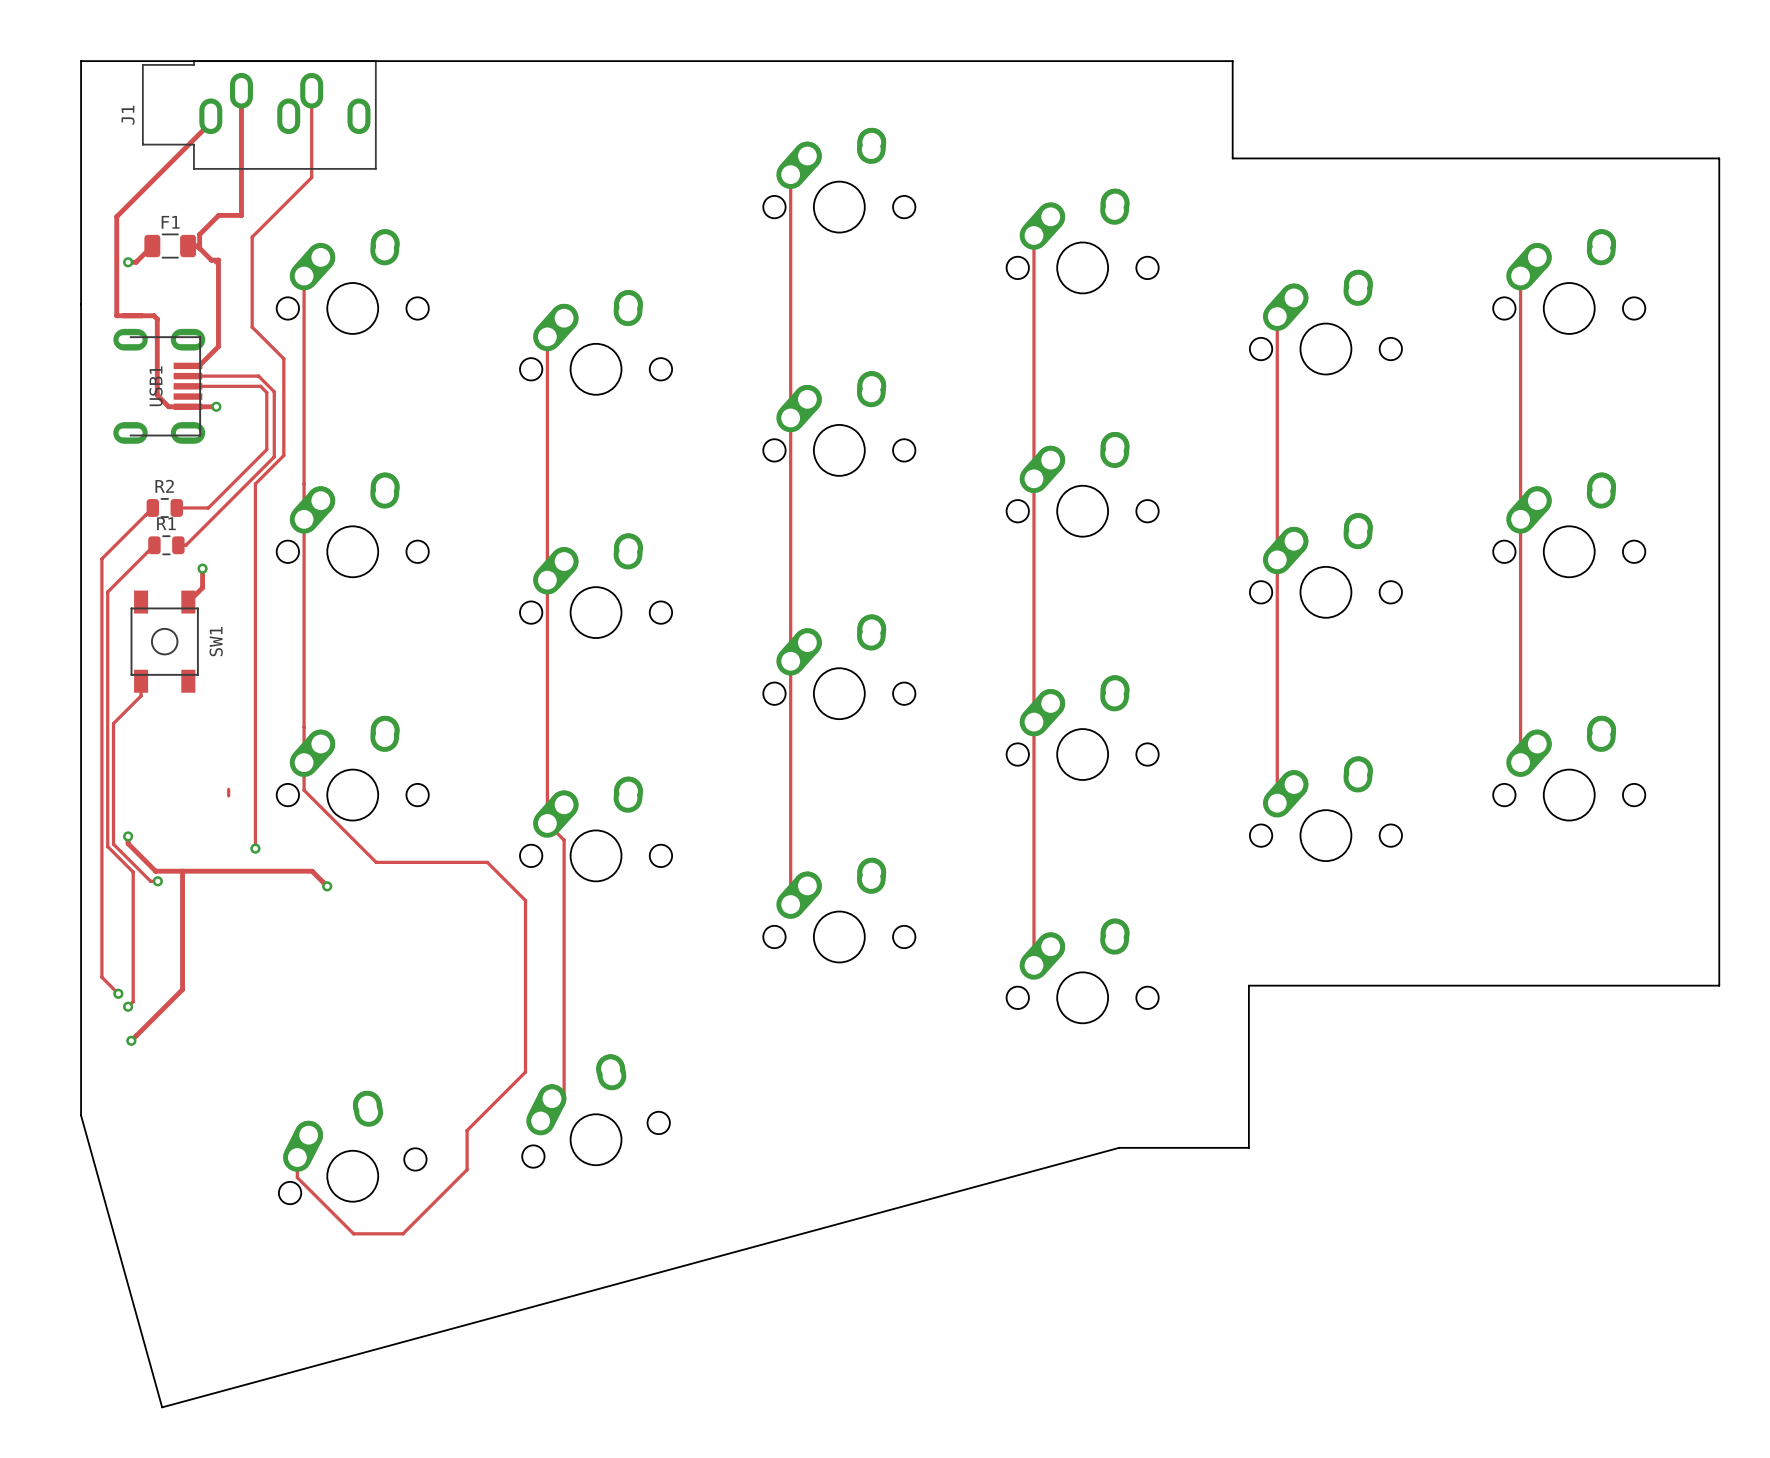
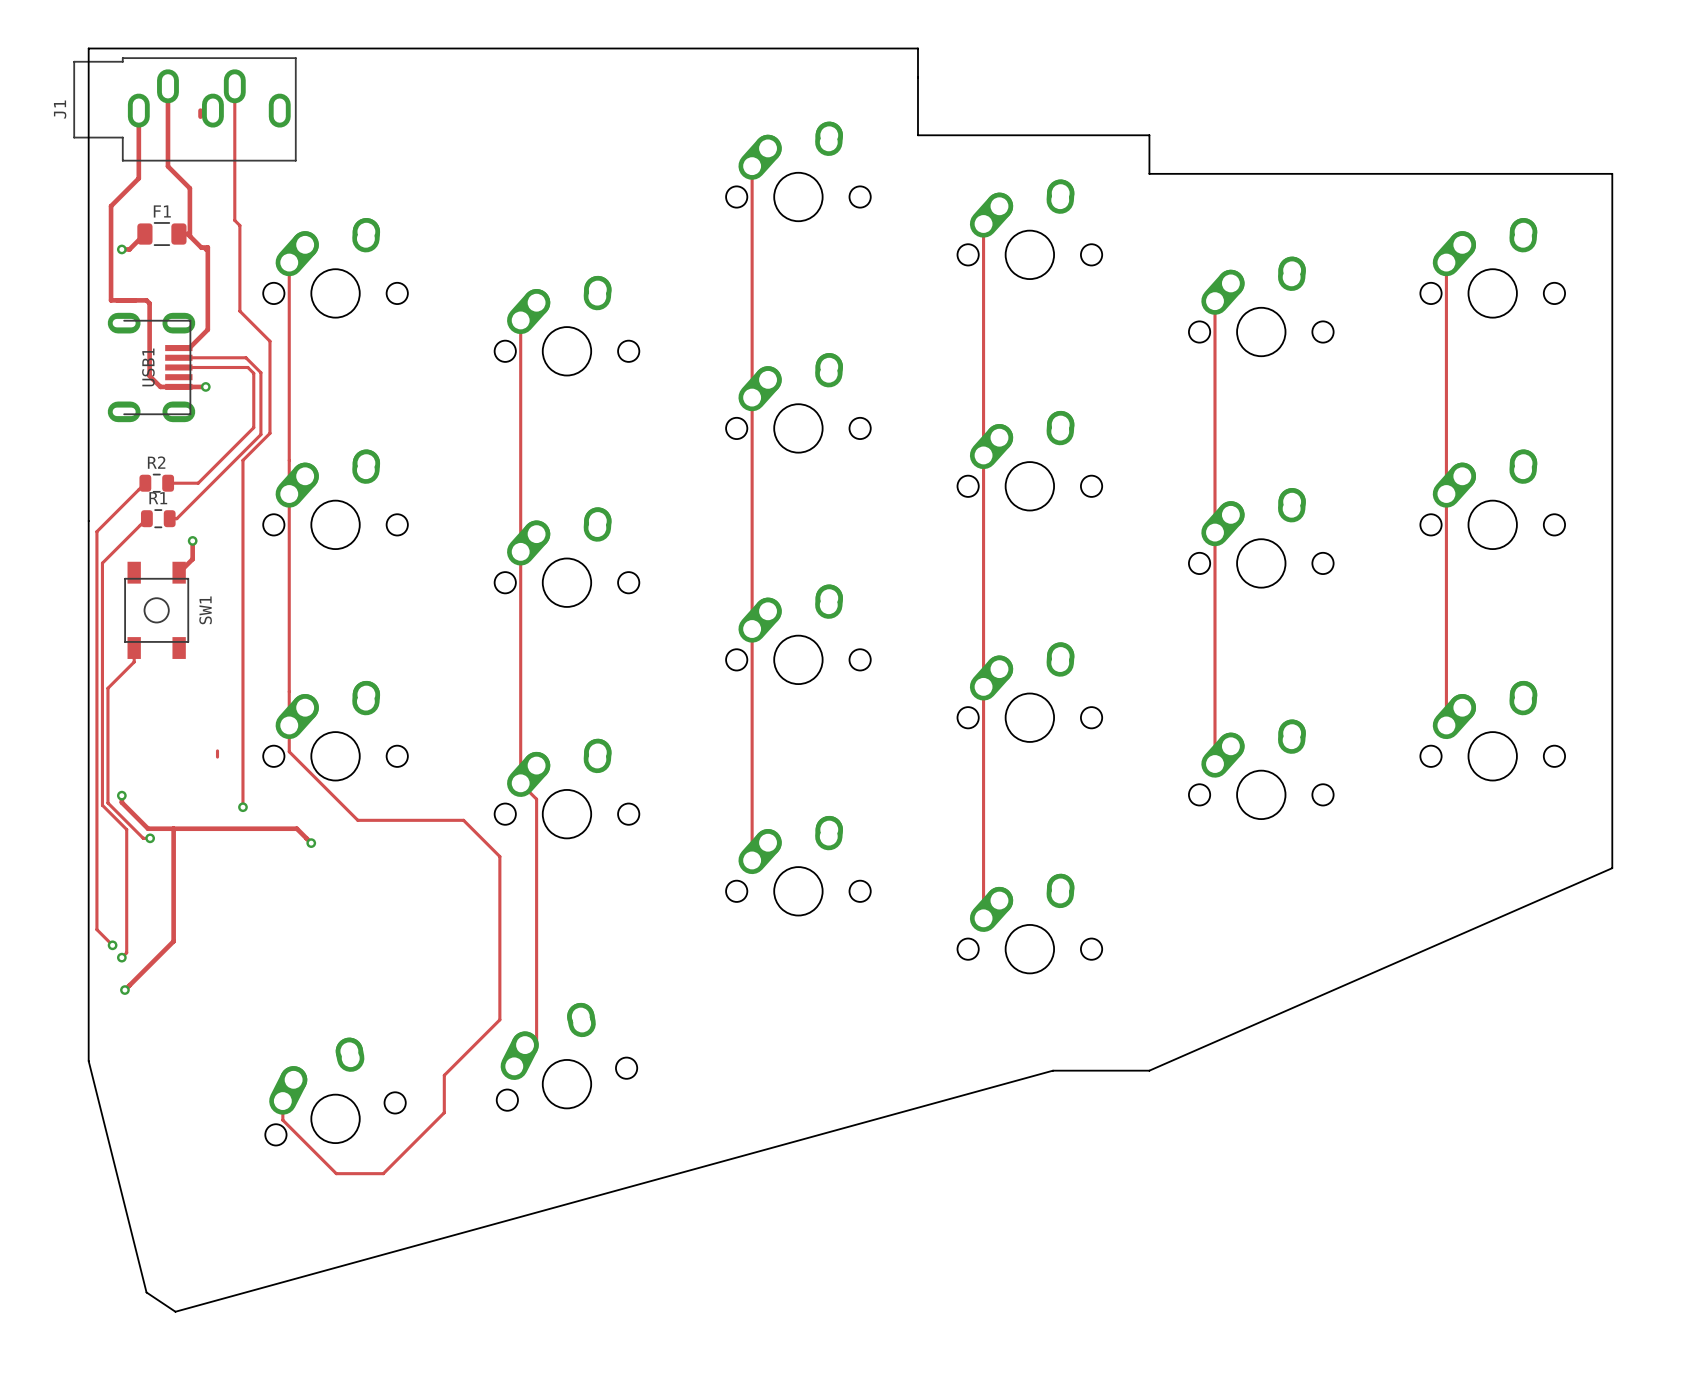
board edge: (81, 61) (81, 1115) (162, 1407) (1119, 1147) (1248, 1147) (1248, 985) (1719, 985) (1719, 158) (1232, 158) (1232, 61) (81, 61) -> (88, 48) (88, 1061) (146, 1292) (175, 1311) (1052, 1070) (1149, 1070) (1612, 868) (1612, 173) (1149, 173) (1149, 135) (917, 135) (917, 48) (88, 48)
track: (241, 90) (241, 215) (218, 215) (199, 234) -> (167, 86) (167, 166) (189, 188) (189, 223)
track: (311, 90) (311, 177) (252, 237) -> (234, 86) (234, 220) (239, 225)
J1 position: (259, 114) -> (184, 109)
track: (210, 122) (145, 187) -> (138, 110) (138, 178)

